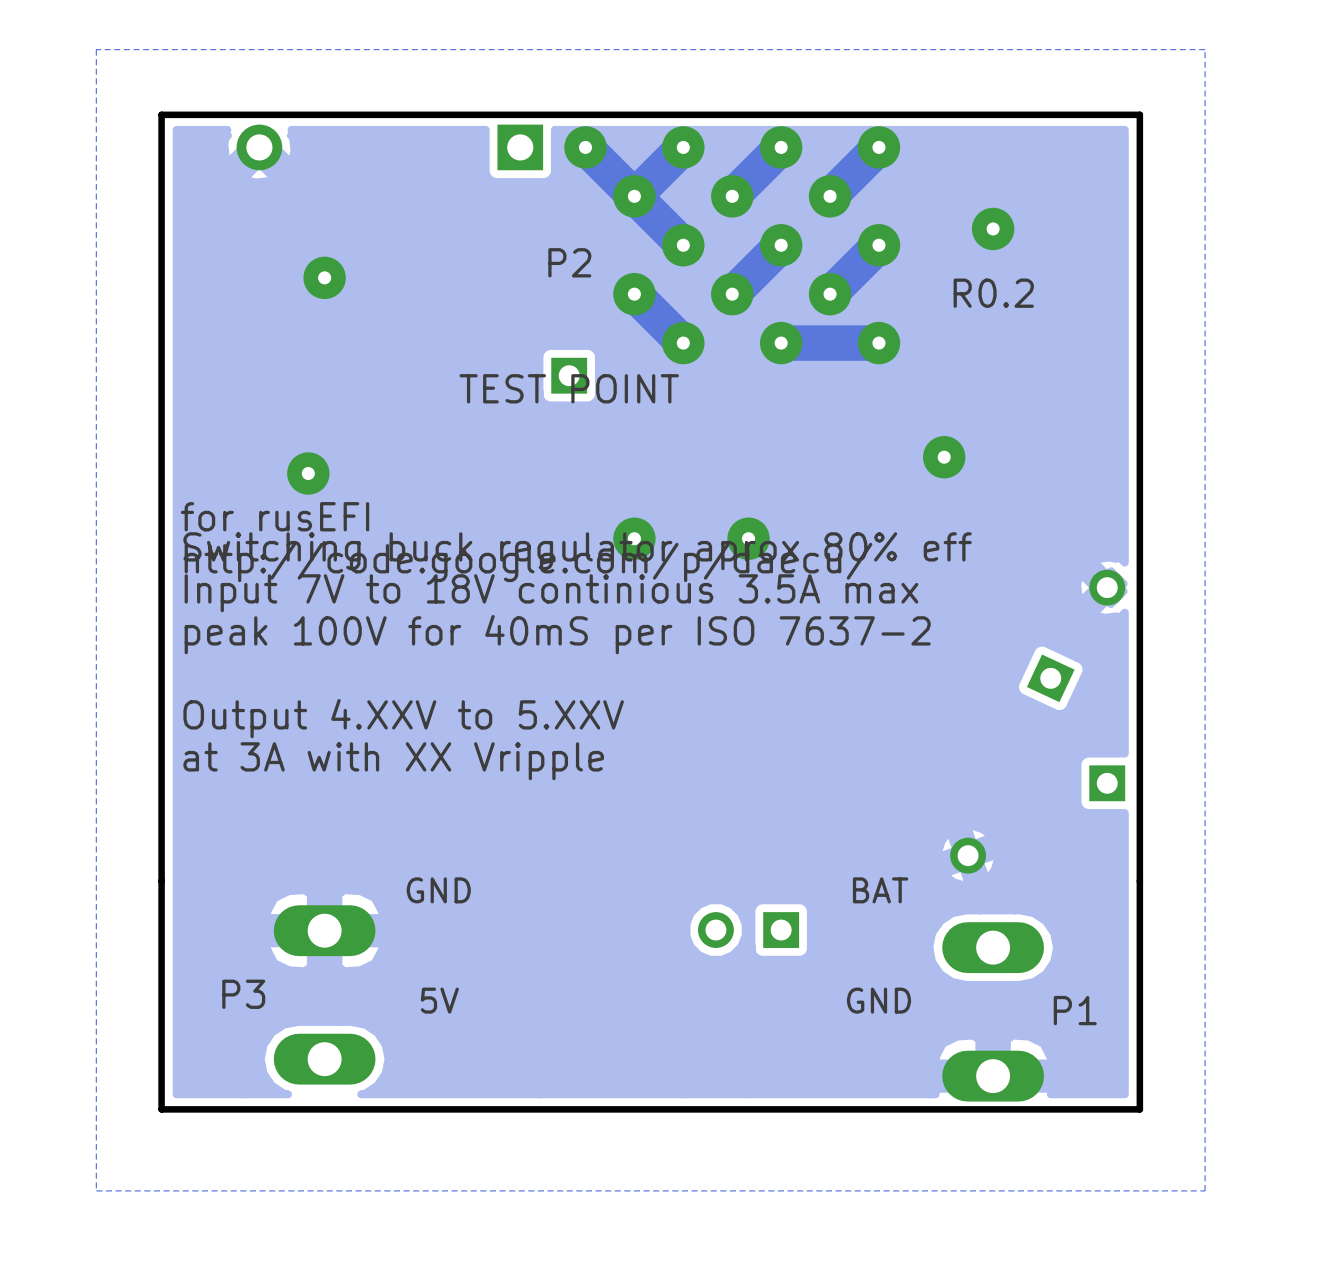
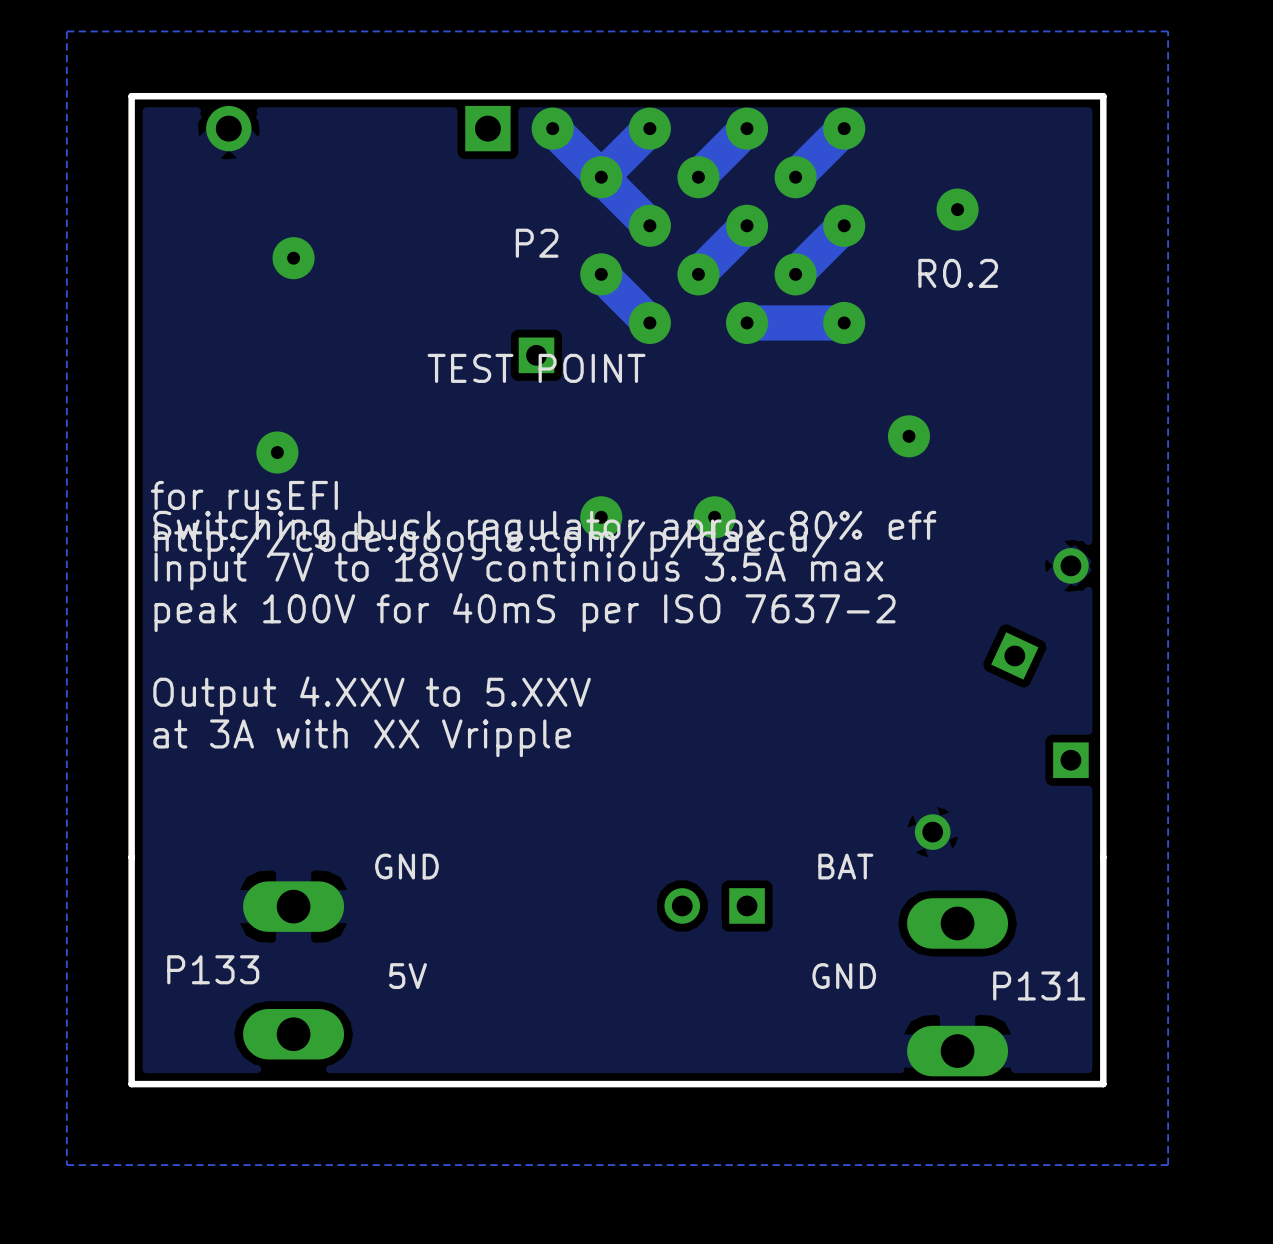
text: P3 (243, 994) -> P133 (213, 969)
text: P1 (1075, 1010) -> P131 (1039, 985)

